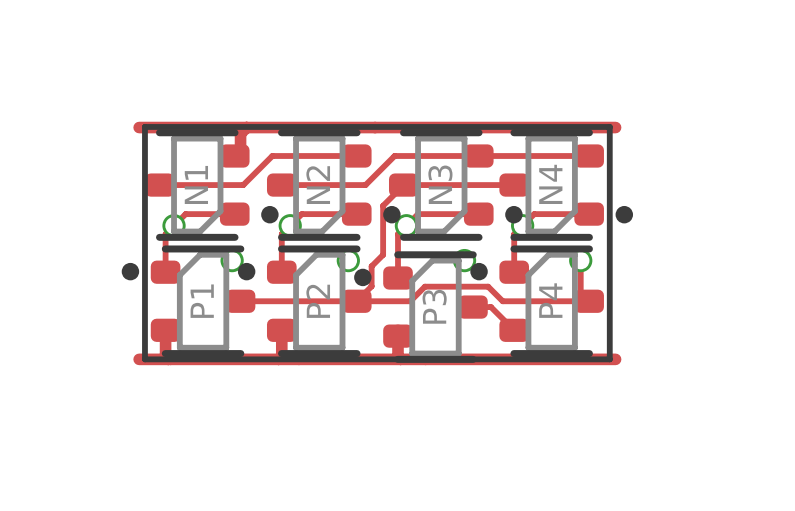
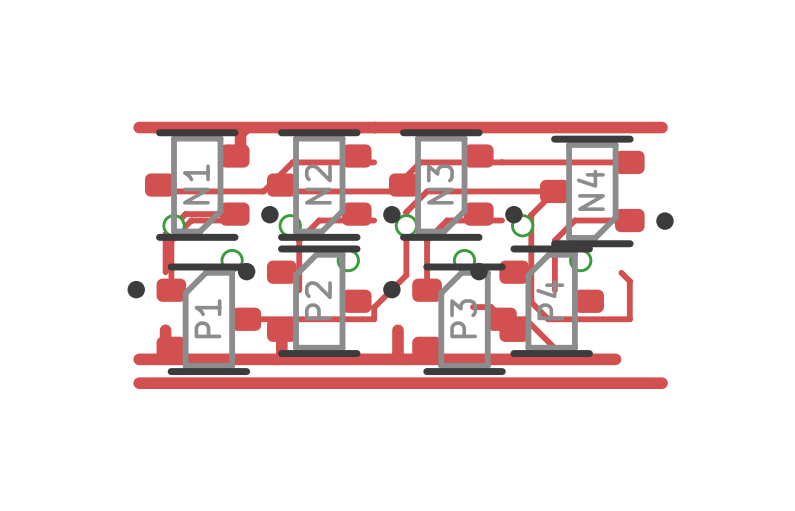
line: (144, 126) (609, 126) (609, 359) (144, 359) (144, 126) -> none
track: none -> (615, 127) (662, 127)
track: (353, 156) (272, 156) (243, 185) (159, 185) -> none
track: (589, 156) (394, 156) (365, 185) (278, 185) -> none
track: none -> (374, 162) (292, 162) (263, 191) (171, 191)
track: none -> (629, 162) (420, 162) (391, 191) (299, 191)
track: (398, 185) (514, 185) -> none
track: (403, 185) (383, 205) (383, 254) (371, 266) (371, 286) (356, 301) -> none
N4 position: (566, 185) -> (606, 191)
track: (356, 214) (301, 214) (281, 234) (281, 272) -> none
track: (472, 214) (418, 214) (398, 234) (398, 272) -> none
track: (589, 214) (534, 214) (514, 234) (514, 272) -> none
track: none -> (246, 220) (191, 220) (171, 240) (171, 290)
track: none -> (374, 220) (319, 220) (299, 240) (299, 290)
track: none -> (502, 220) (447, 220) (427, 240) (427, 290)
track: none -> (629, 220) (574, 220) (554, 240) (554, 290)
track: (580, 260) (580, 292) (589, 301) (502, 301) (488, 286) (424, 286) (410, 301) (240, 301) -> none
track: none -> (621, 272) (629, 281) (629, 319) (548, 319) (531, 302) (531, 215) (554, 191) (427, 191) (406, 212) (406, 275) (374, 307) (374, 319) (246, 319)
P1 position: (188, 301) -> (194, 319)
P3 position: (420, 307) -> (450, 319)
track: none -> (502, 319) (525, 319) (554, 348)
track: none -> (139, 383) (662, 383)

